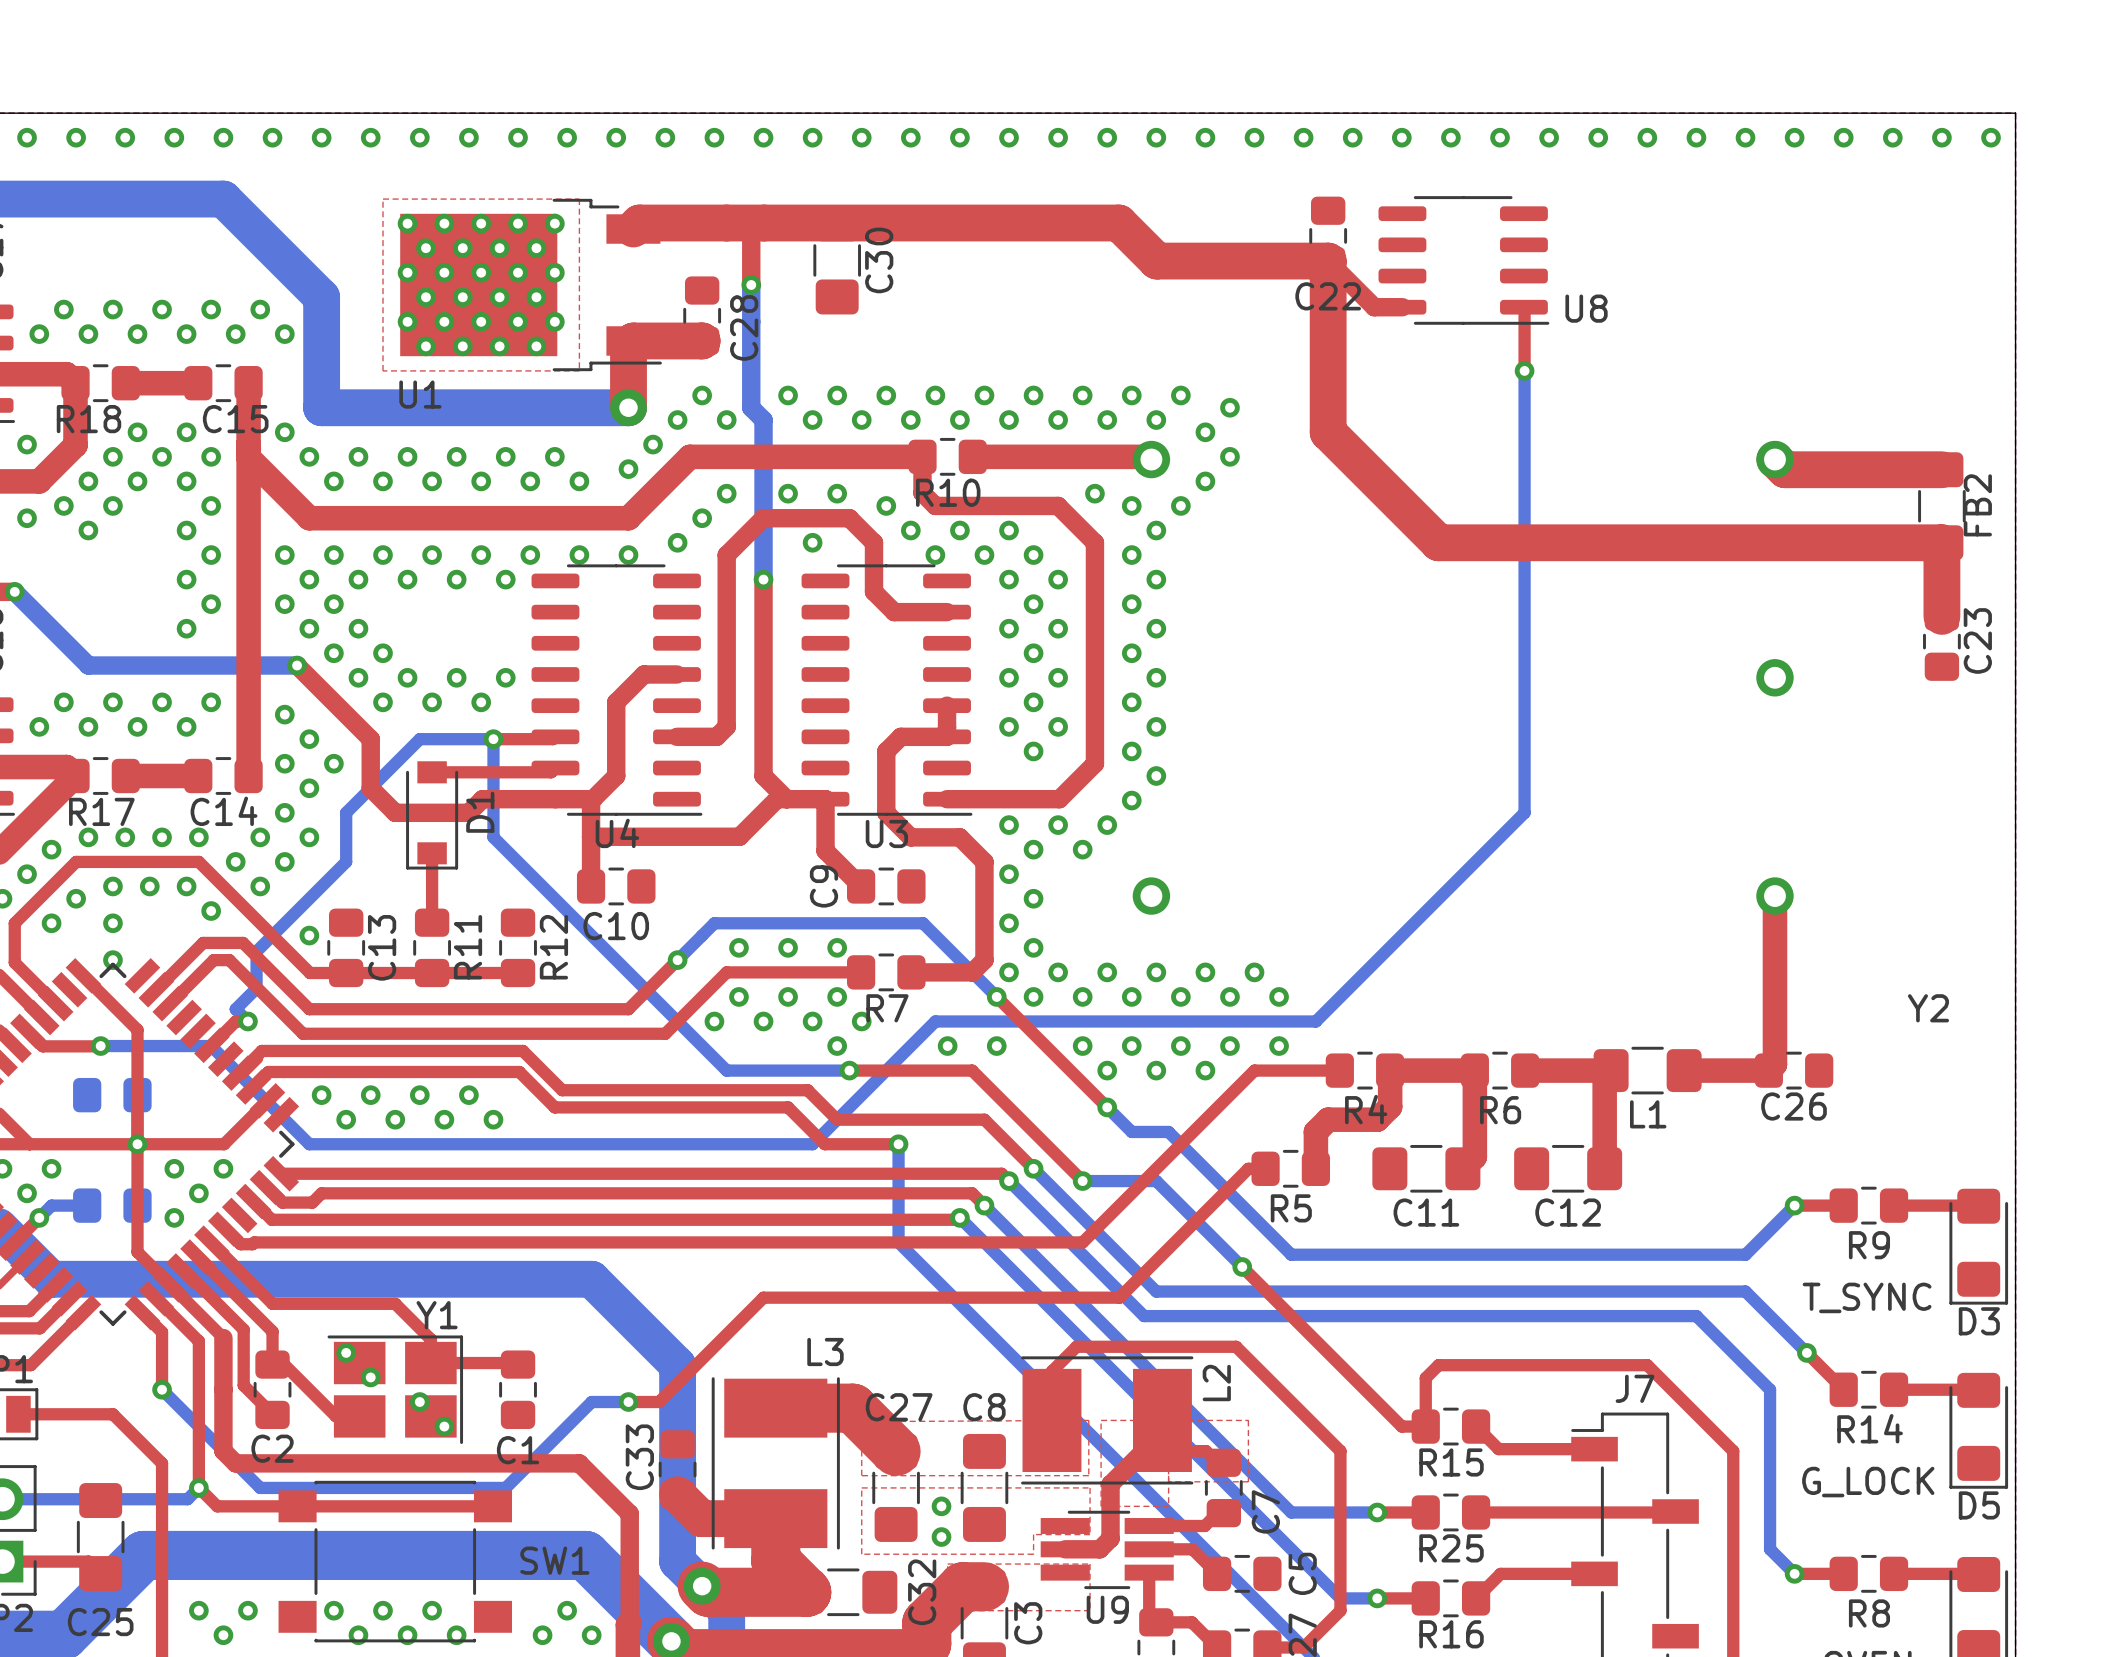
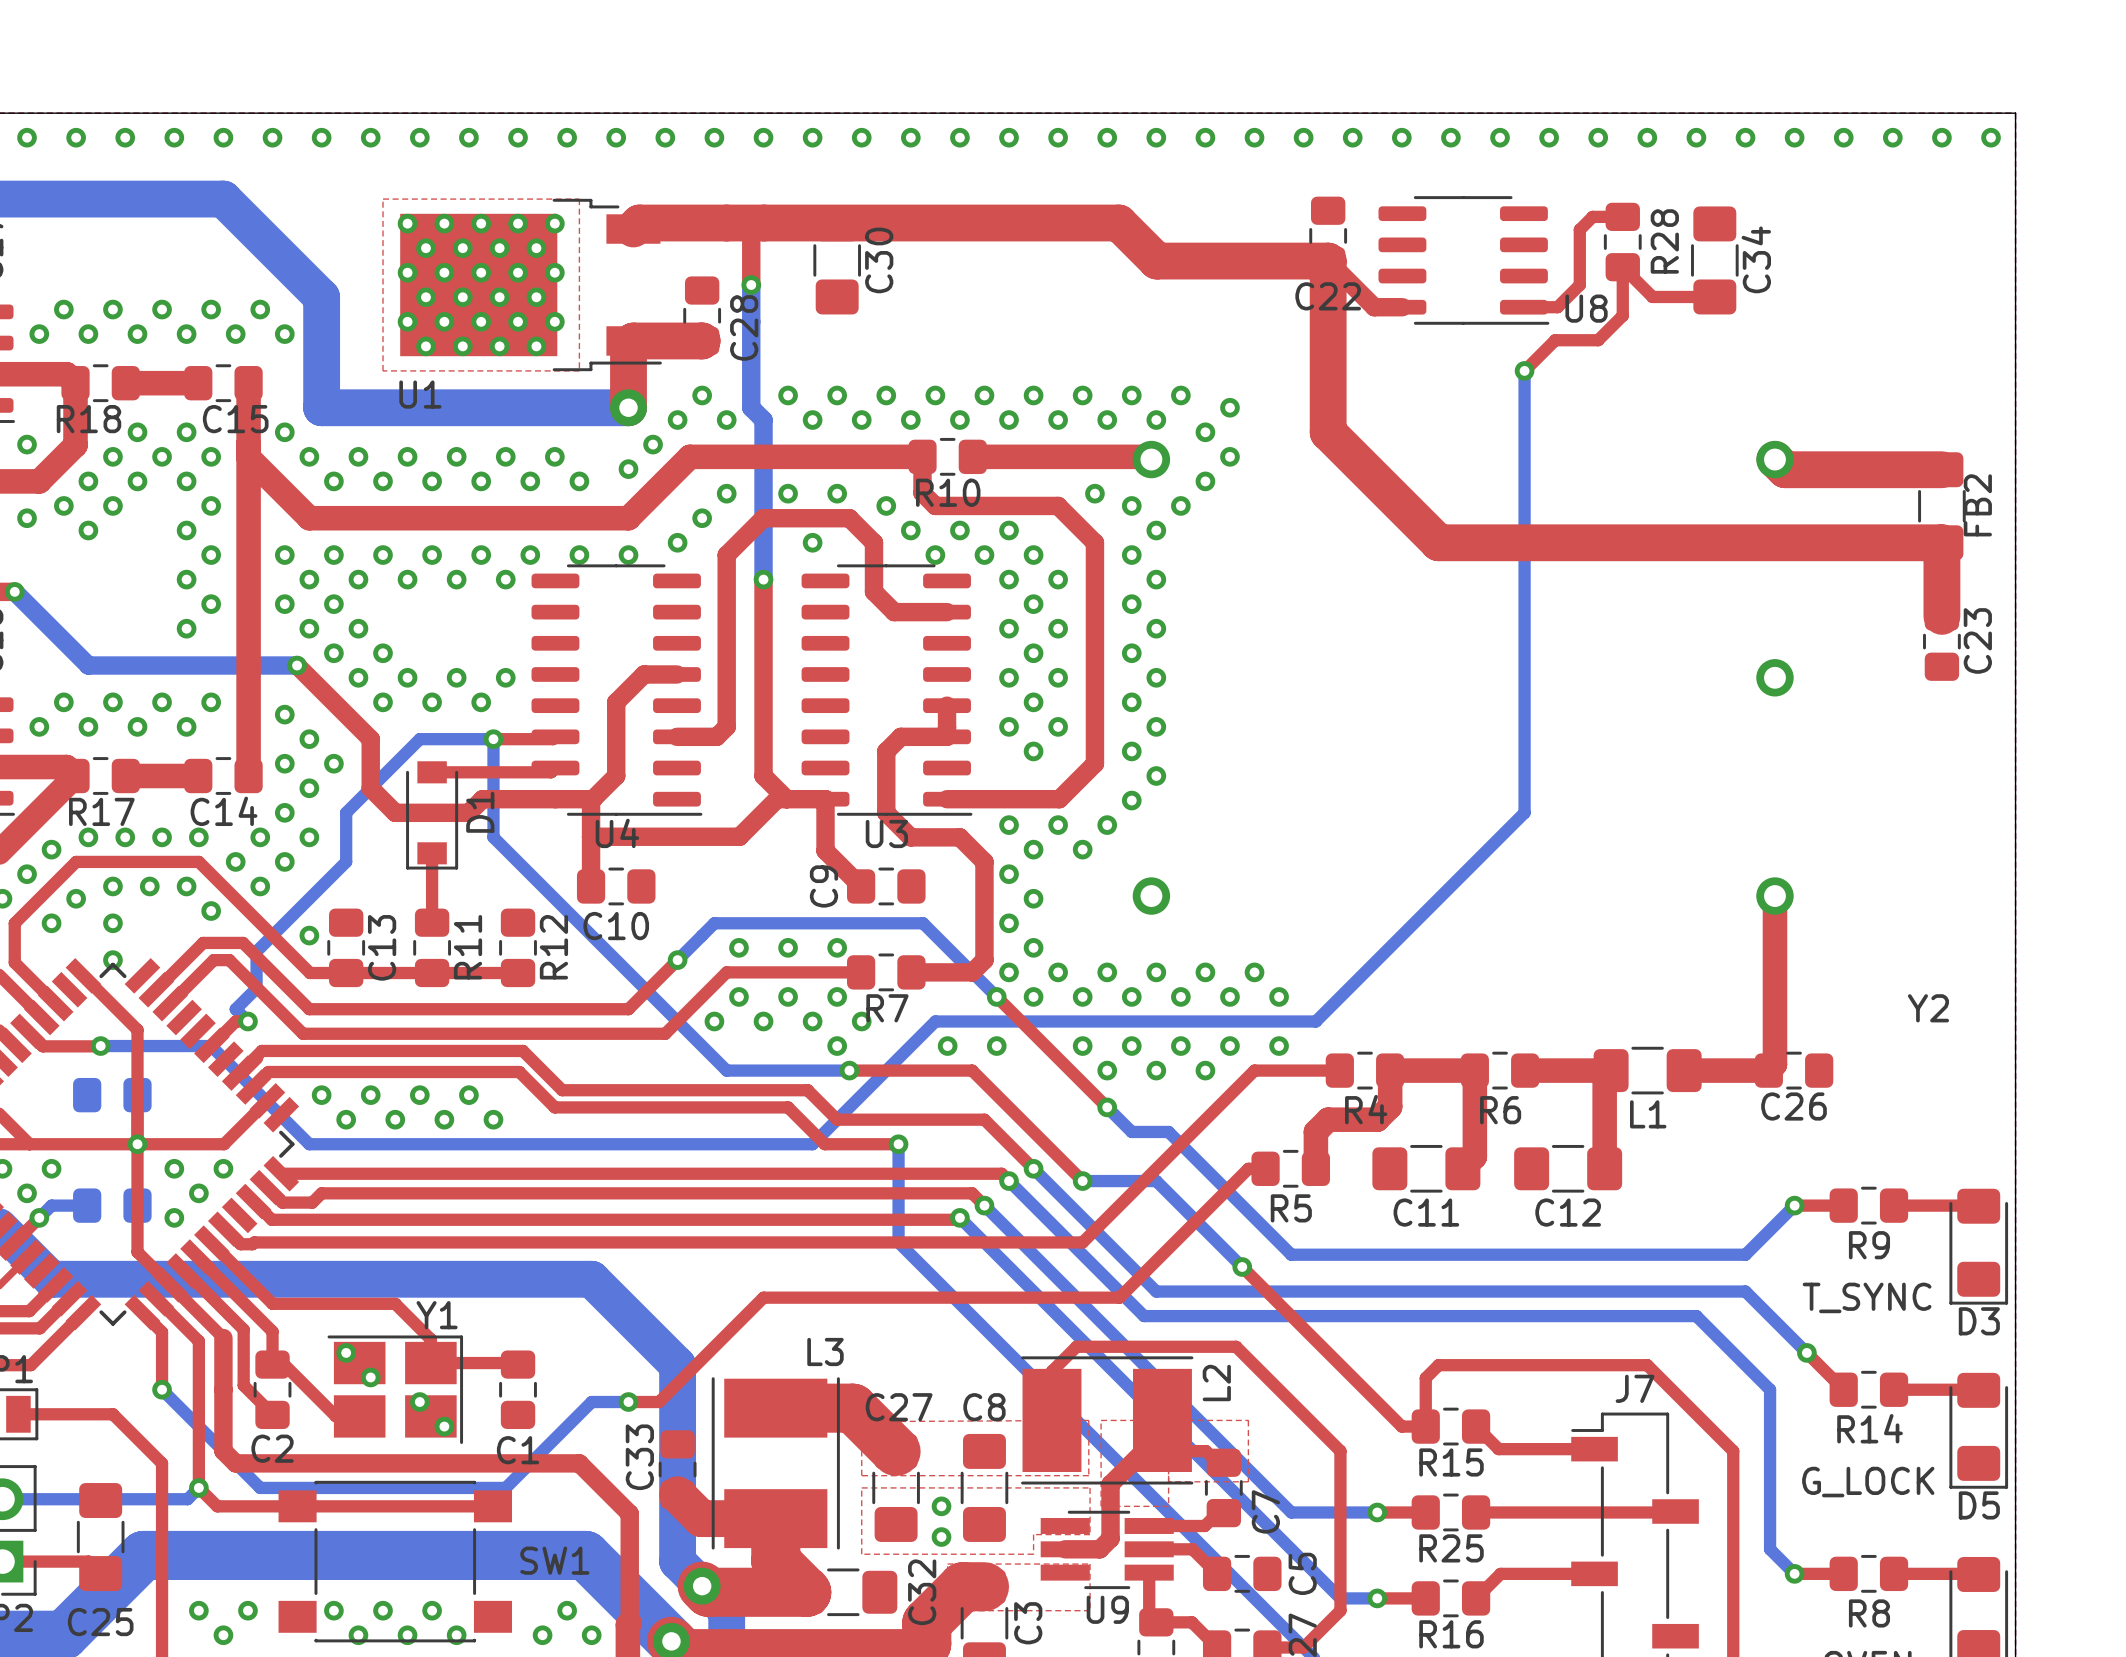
R28: none -> (1622, 242)
C34: none -> (1714, 260)
top track: none -> (1714, 296) (1652, 296) (1622, 267) (1622, 315) (1598, 340) (1555, 340) (1524, 370)
top track: (1524, 307) (1524, 370) -> (1523, 307) (1557, 307) (1579, 285) (1579, 229) (1592, 216) (1622, 216)

